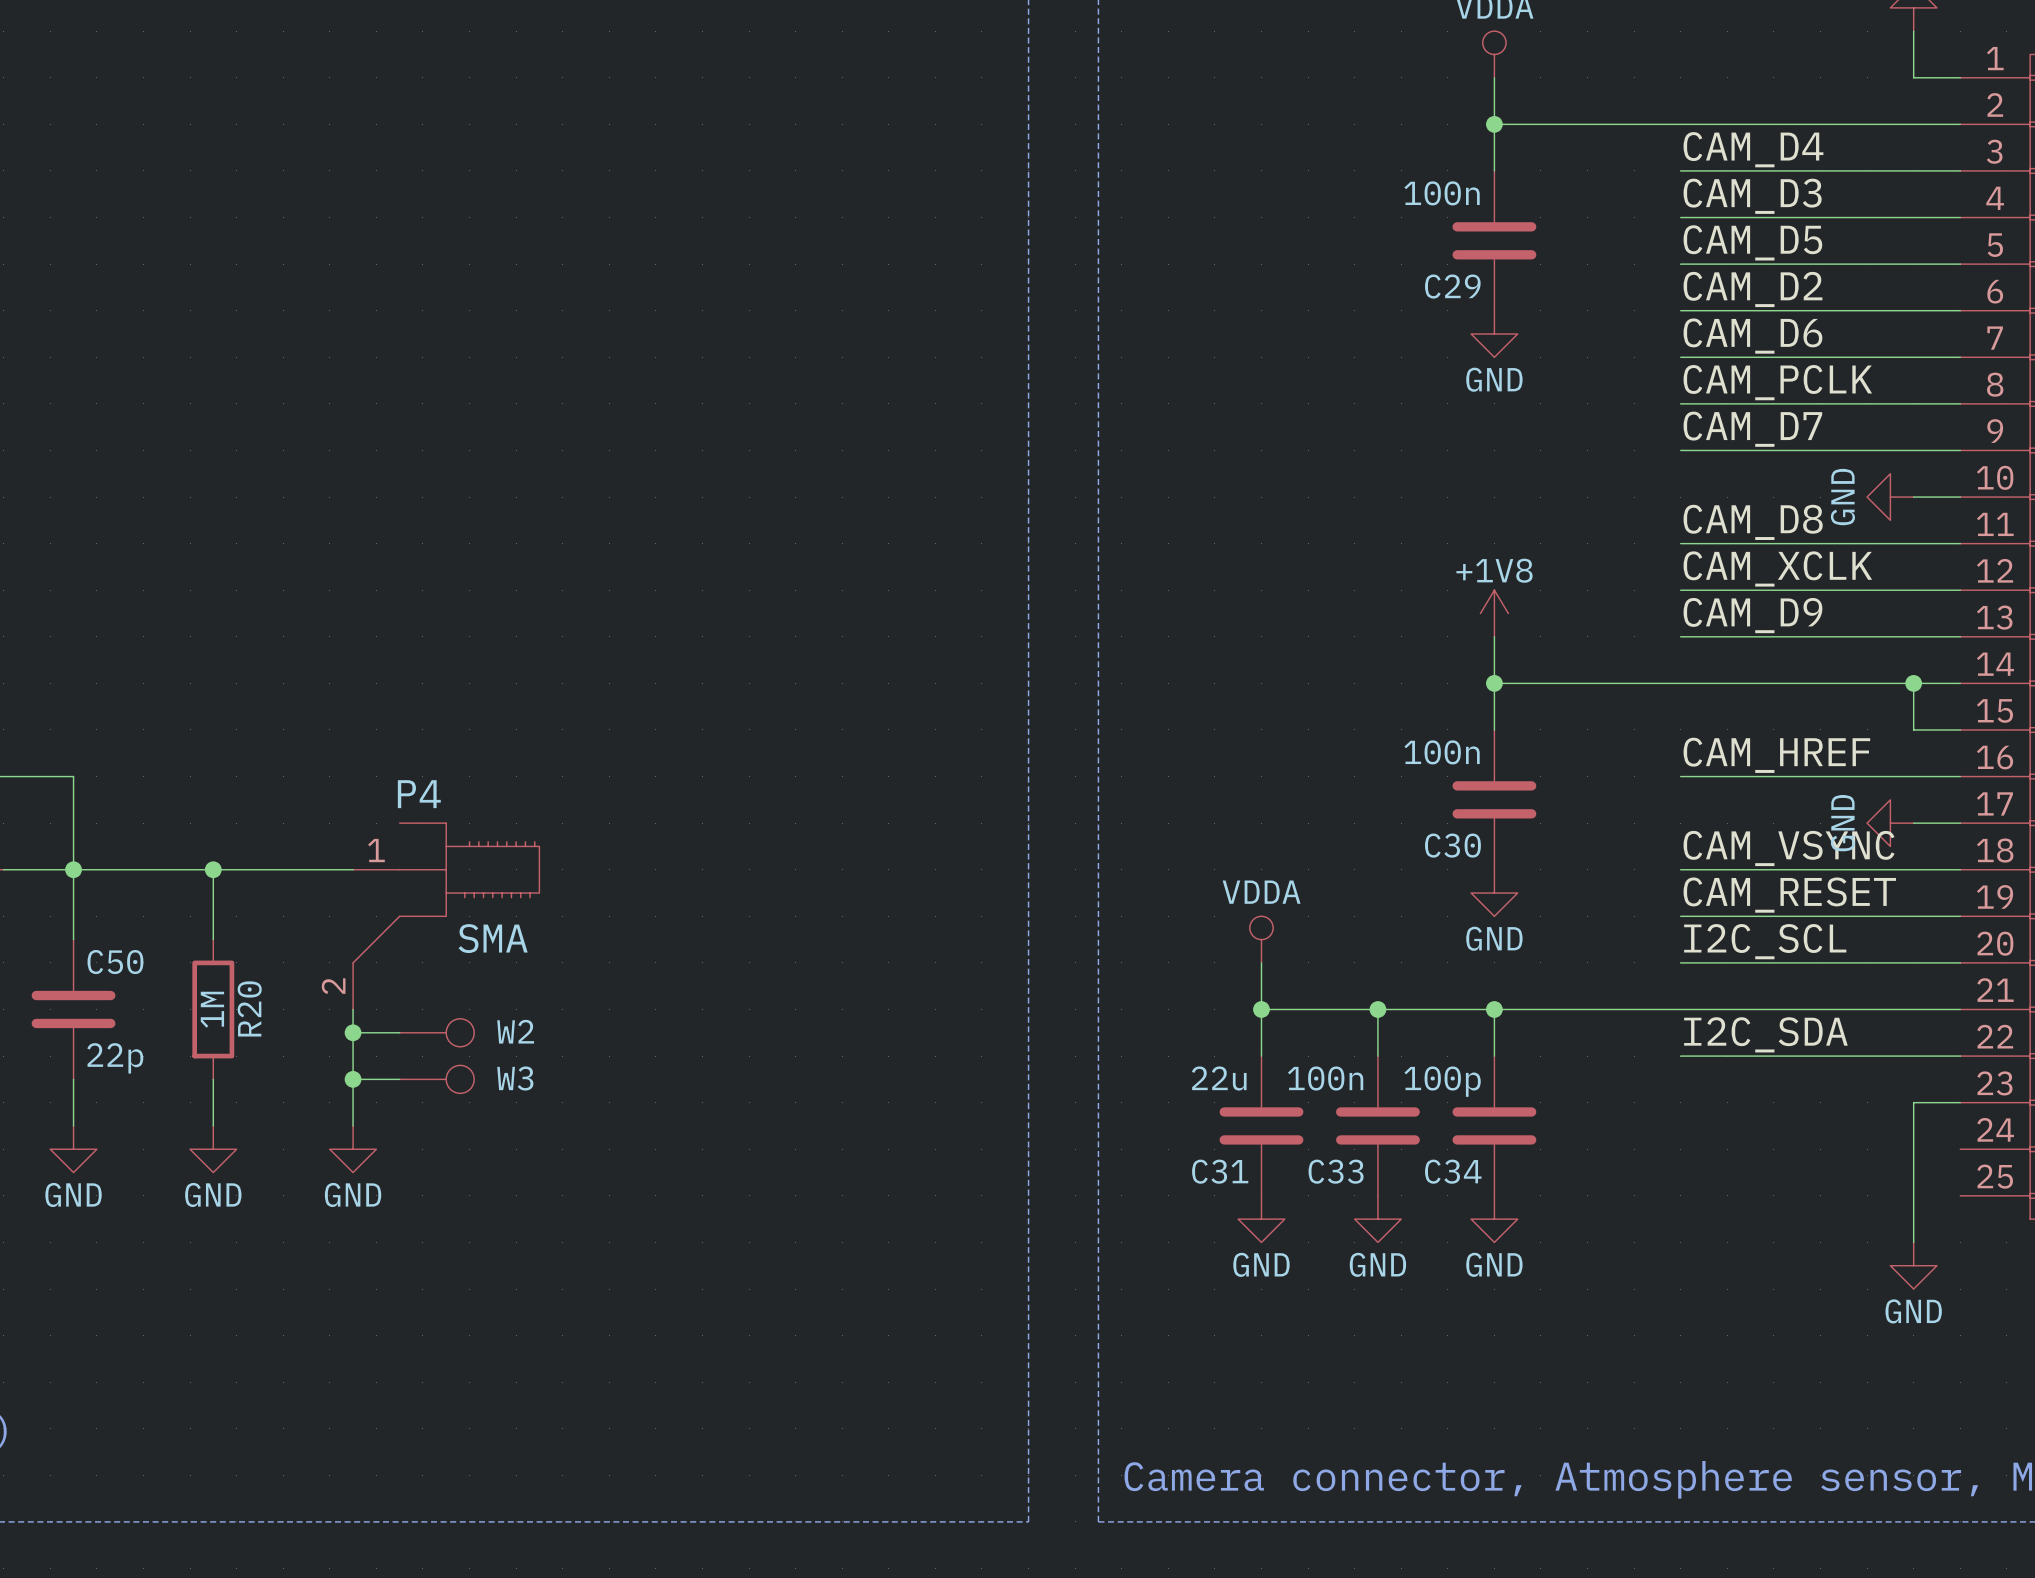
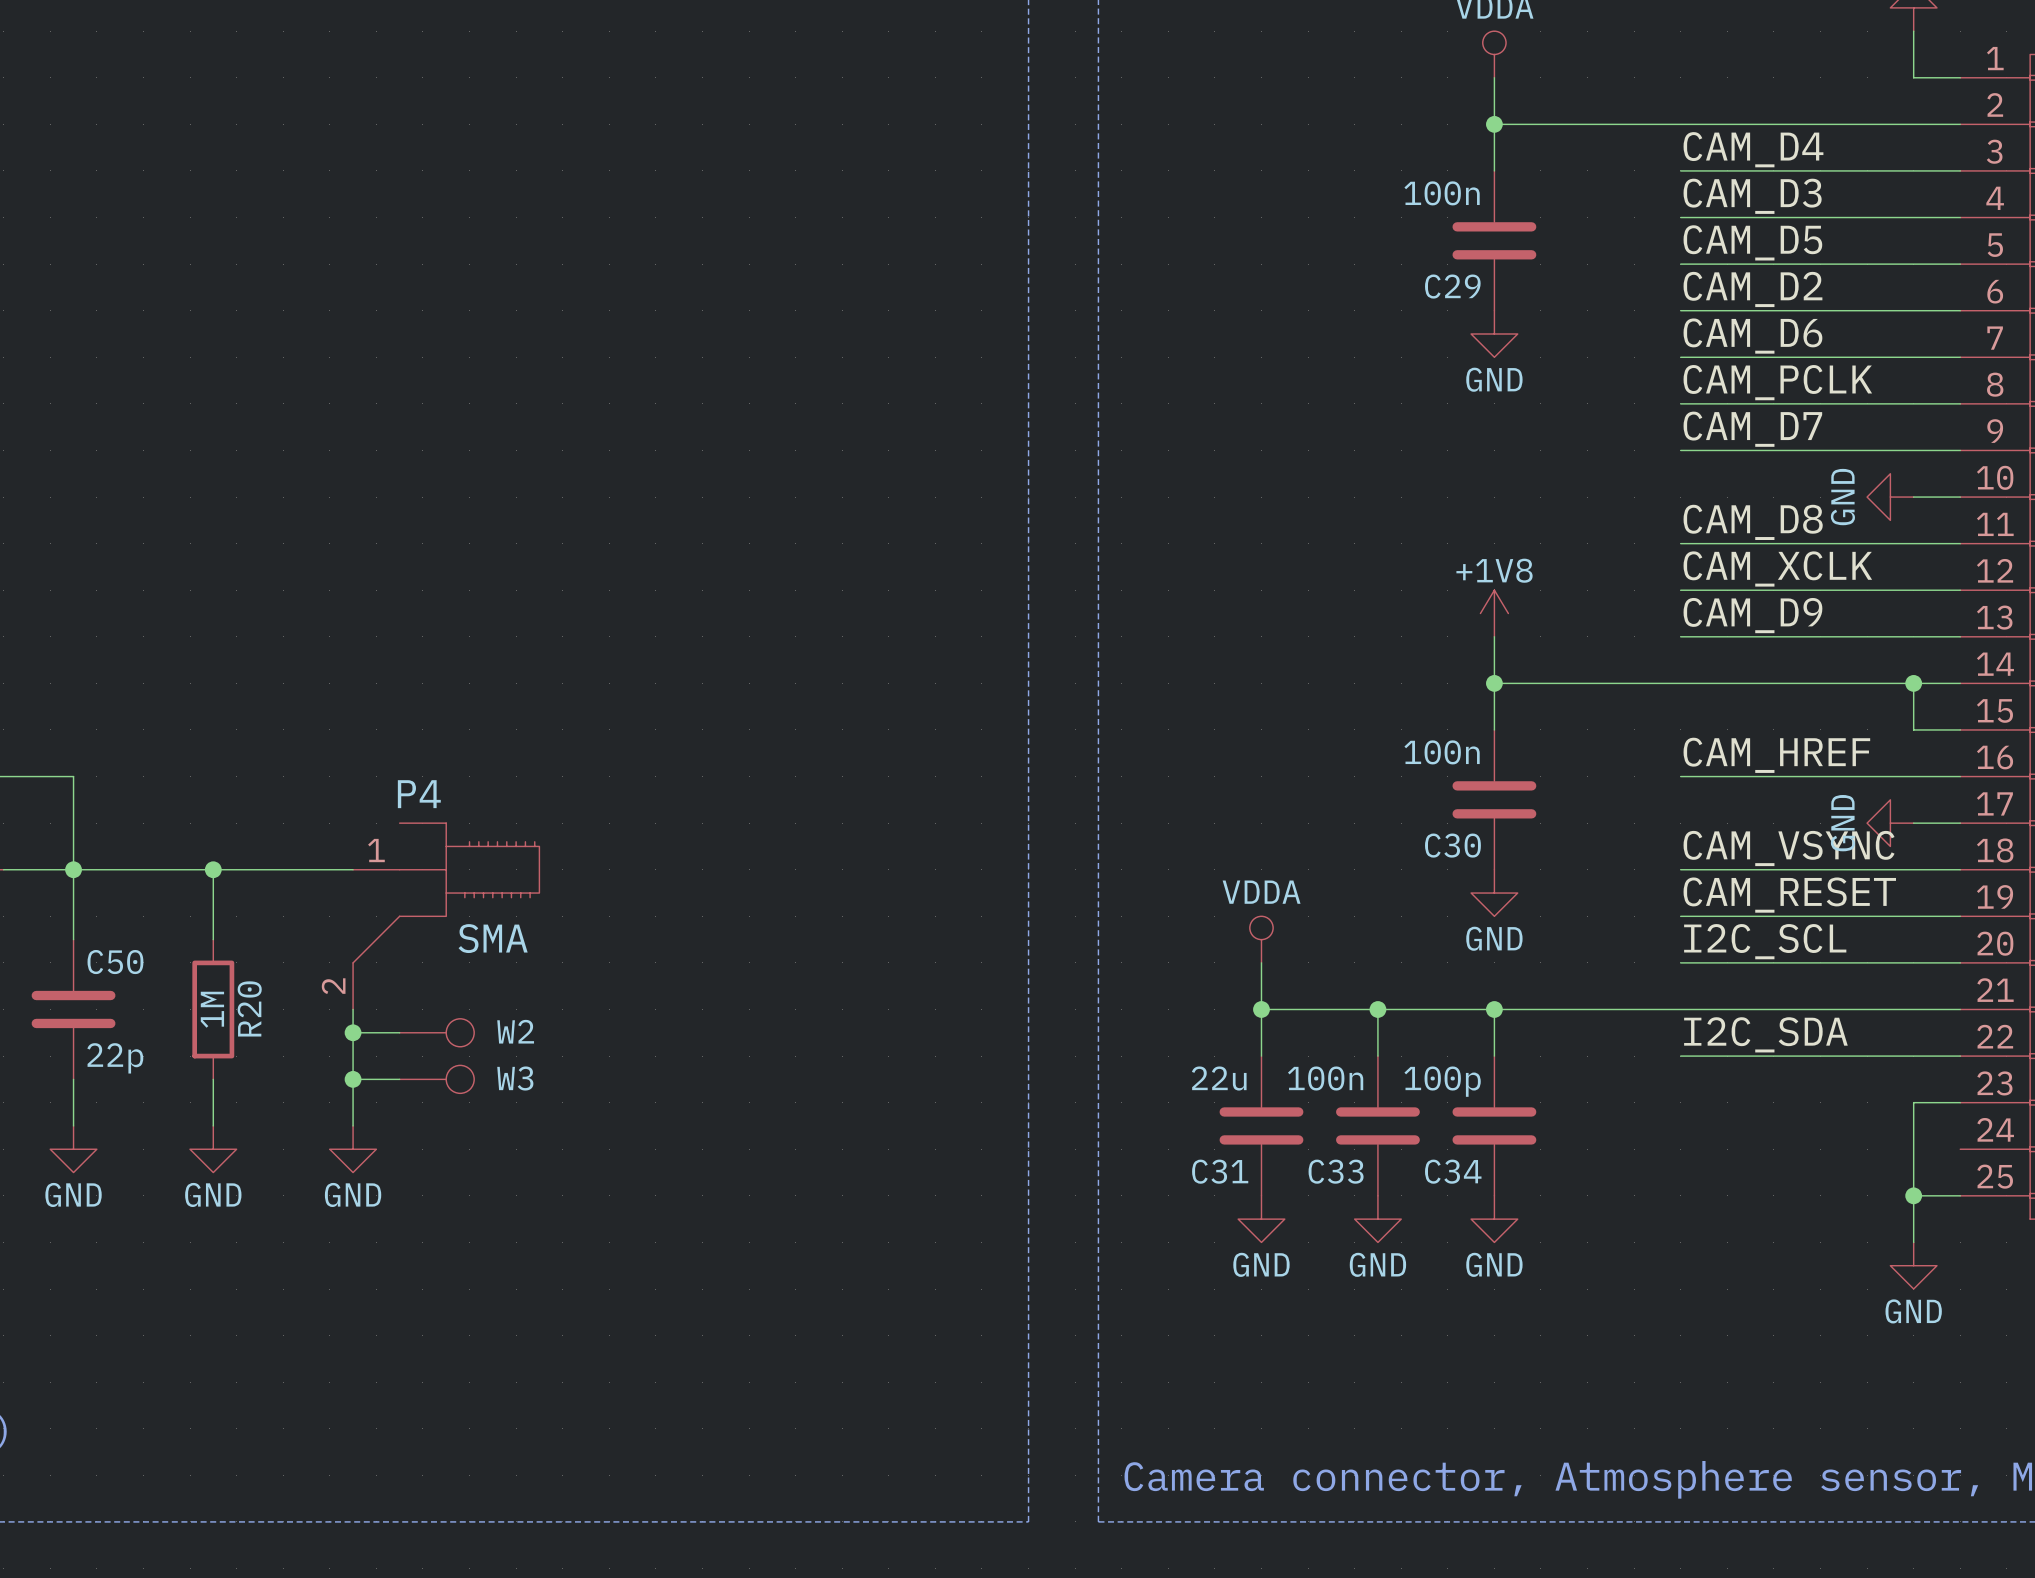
wire: none -> (1913, 1195) (1960, 1195)
junction: none -> (1913, 1195)

